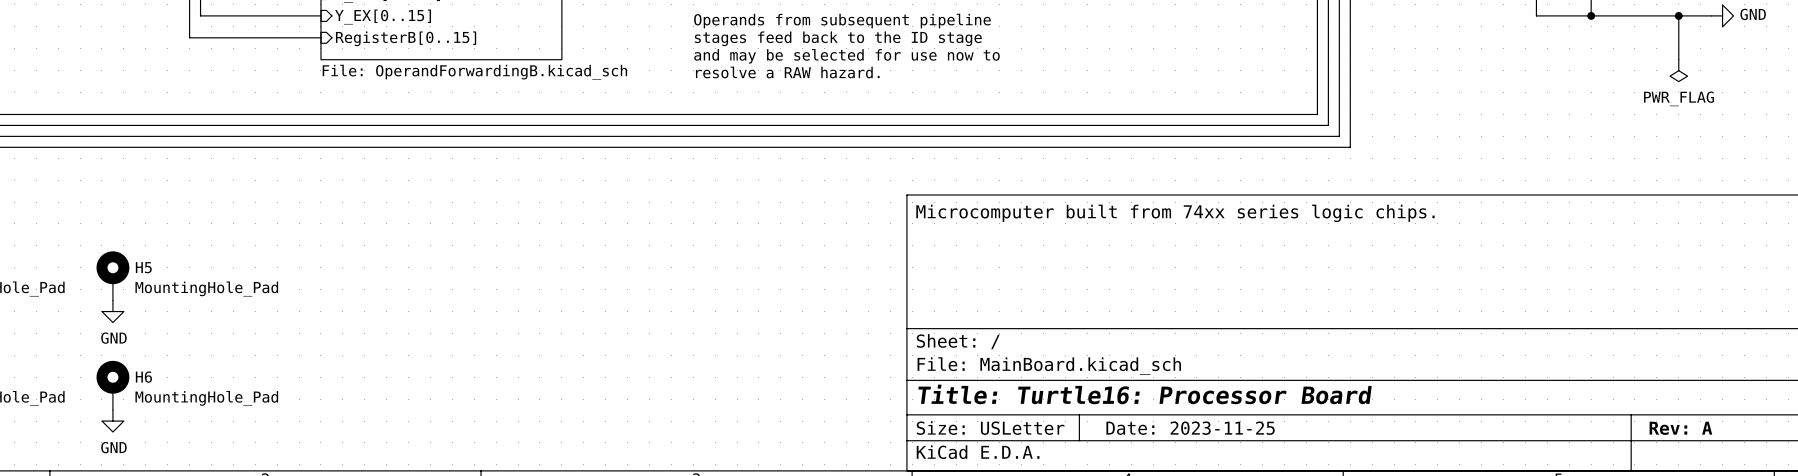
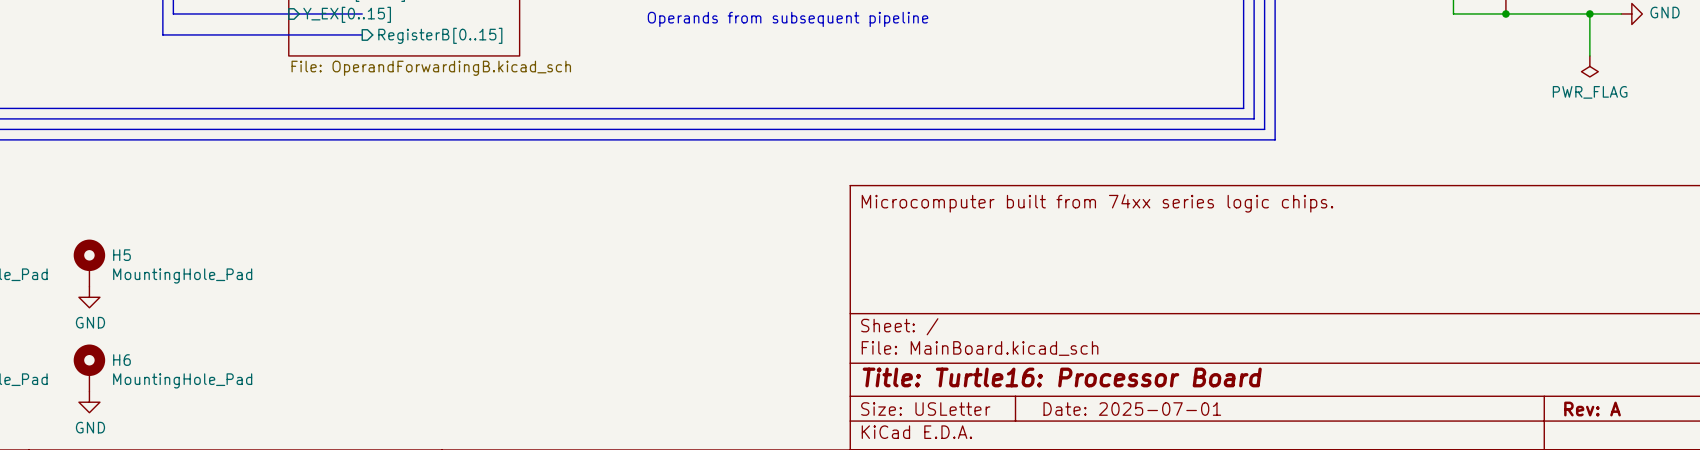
bus: none -> (288, 13) (362, 13)
bus: none -> (288, 34) (362, 34)
sheet pin position: RegisterB[0..15] (406, 38) -> RegisterB[0..15] (440, 35)
text: stages feed back to the ID stage (838, 38) -> none
text: and may be selected for use now to (846, 56) -> none
text: resolve a RAW hazard. (787, 72) -> none
title block: Date: 2023-11-25 (1190, 428) -> Date: 2025-07-01 (1132, 409)

